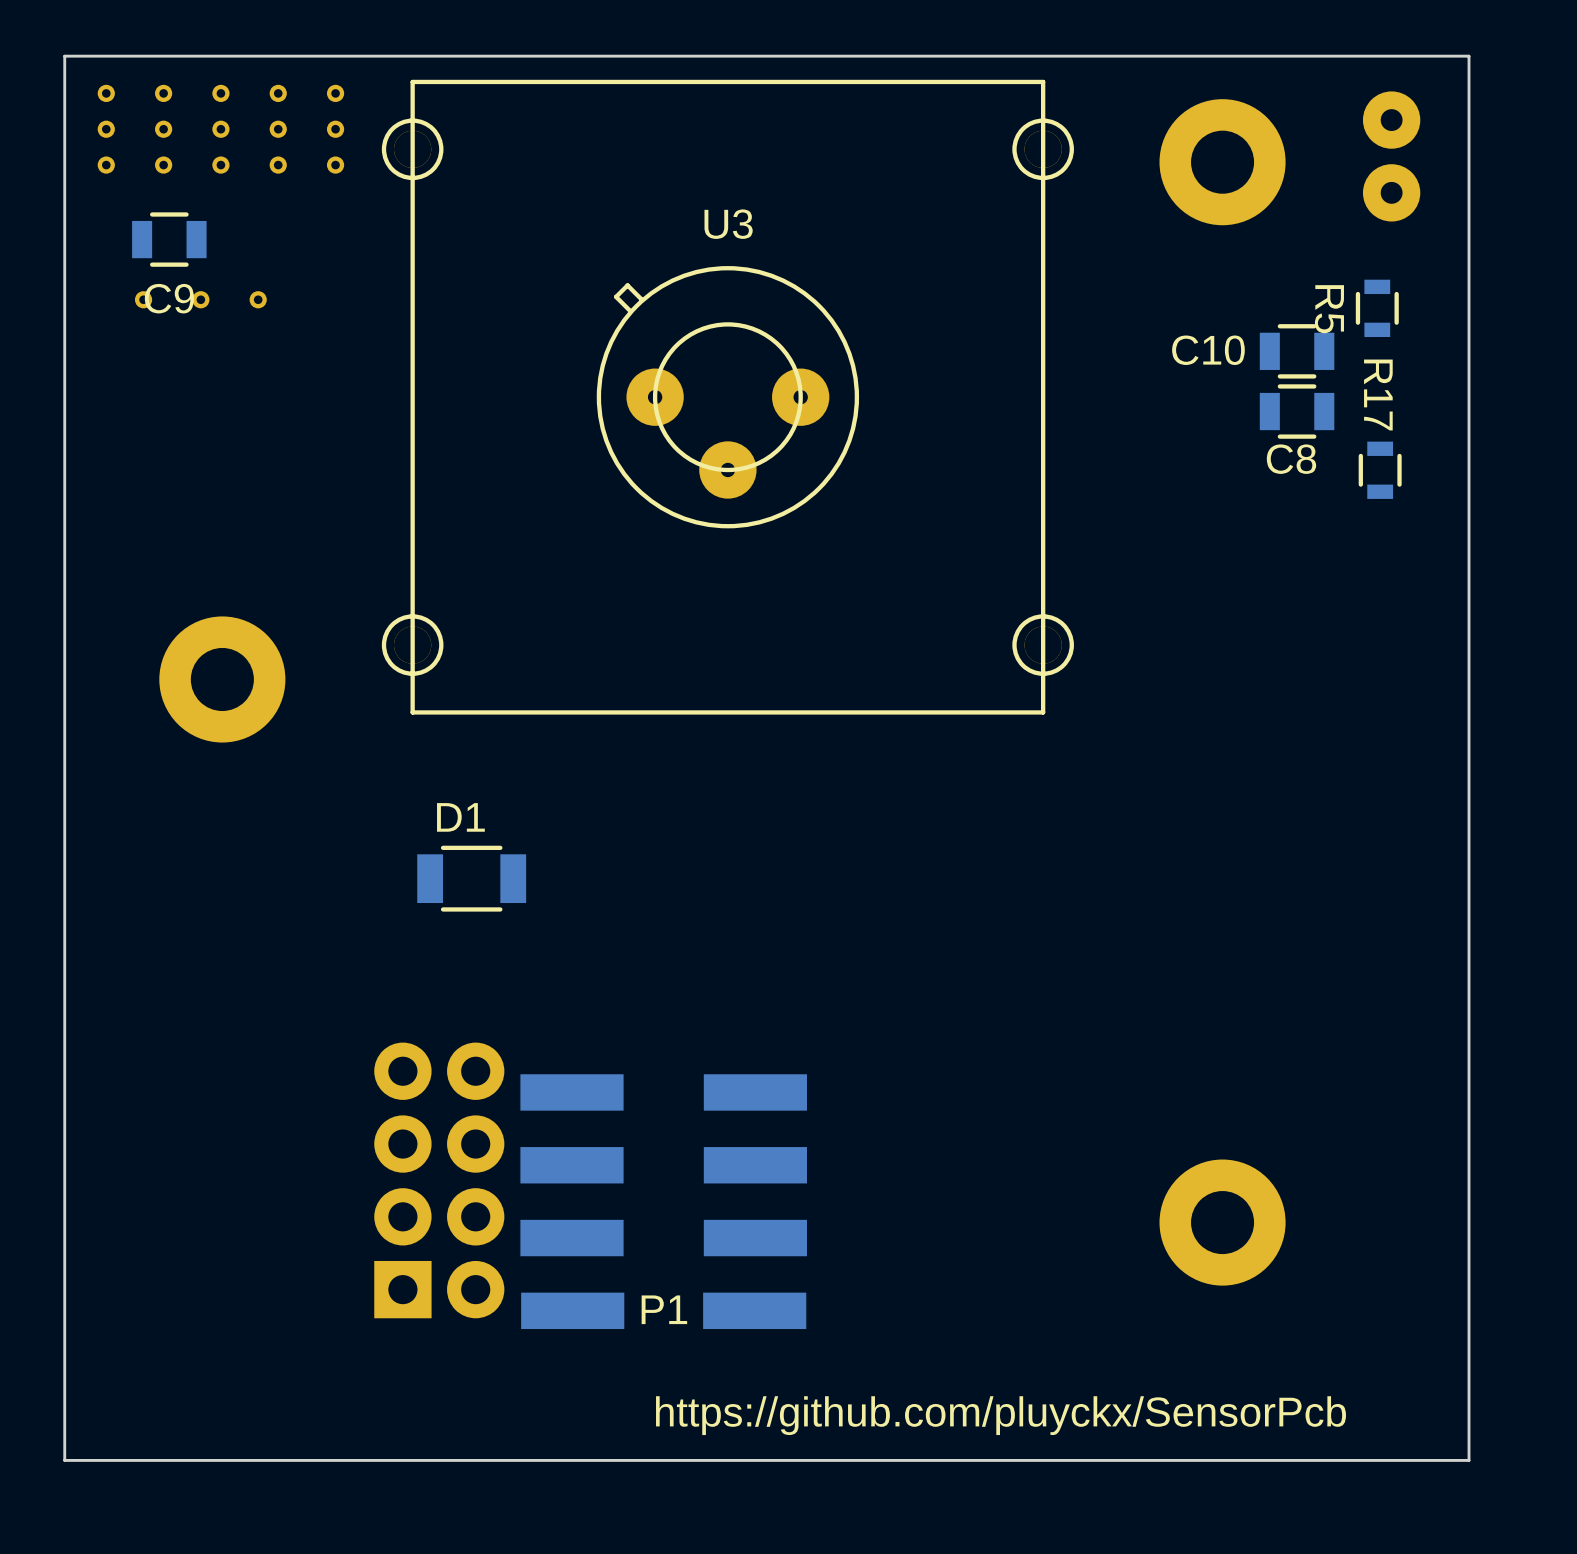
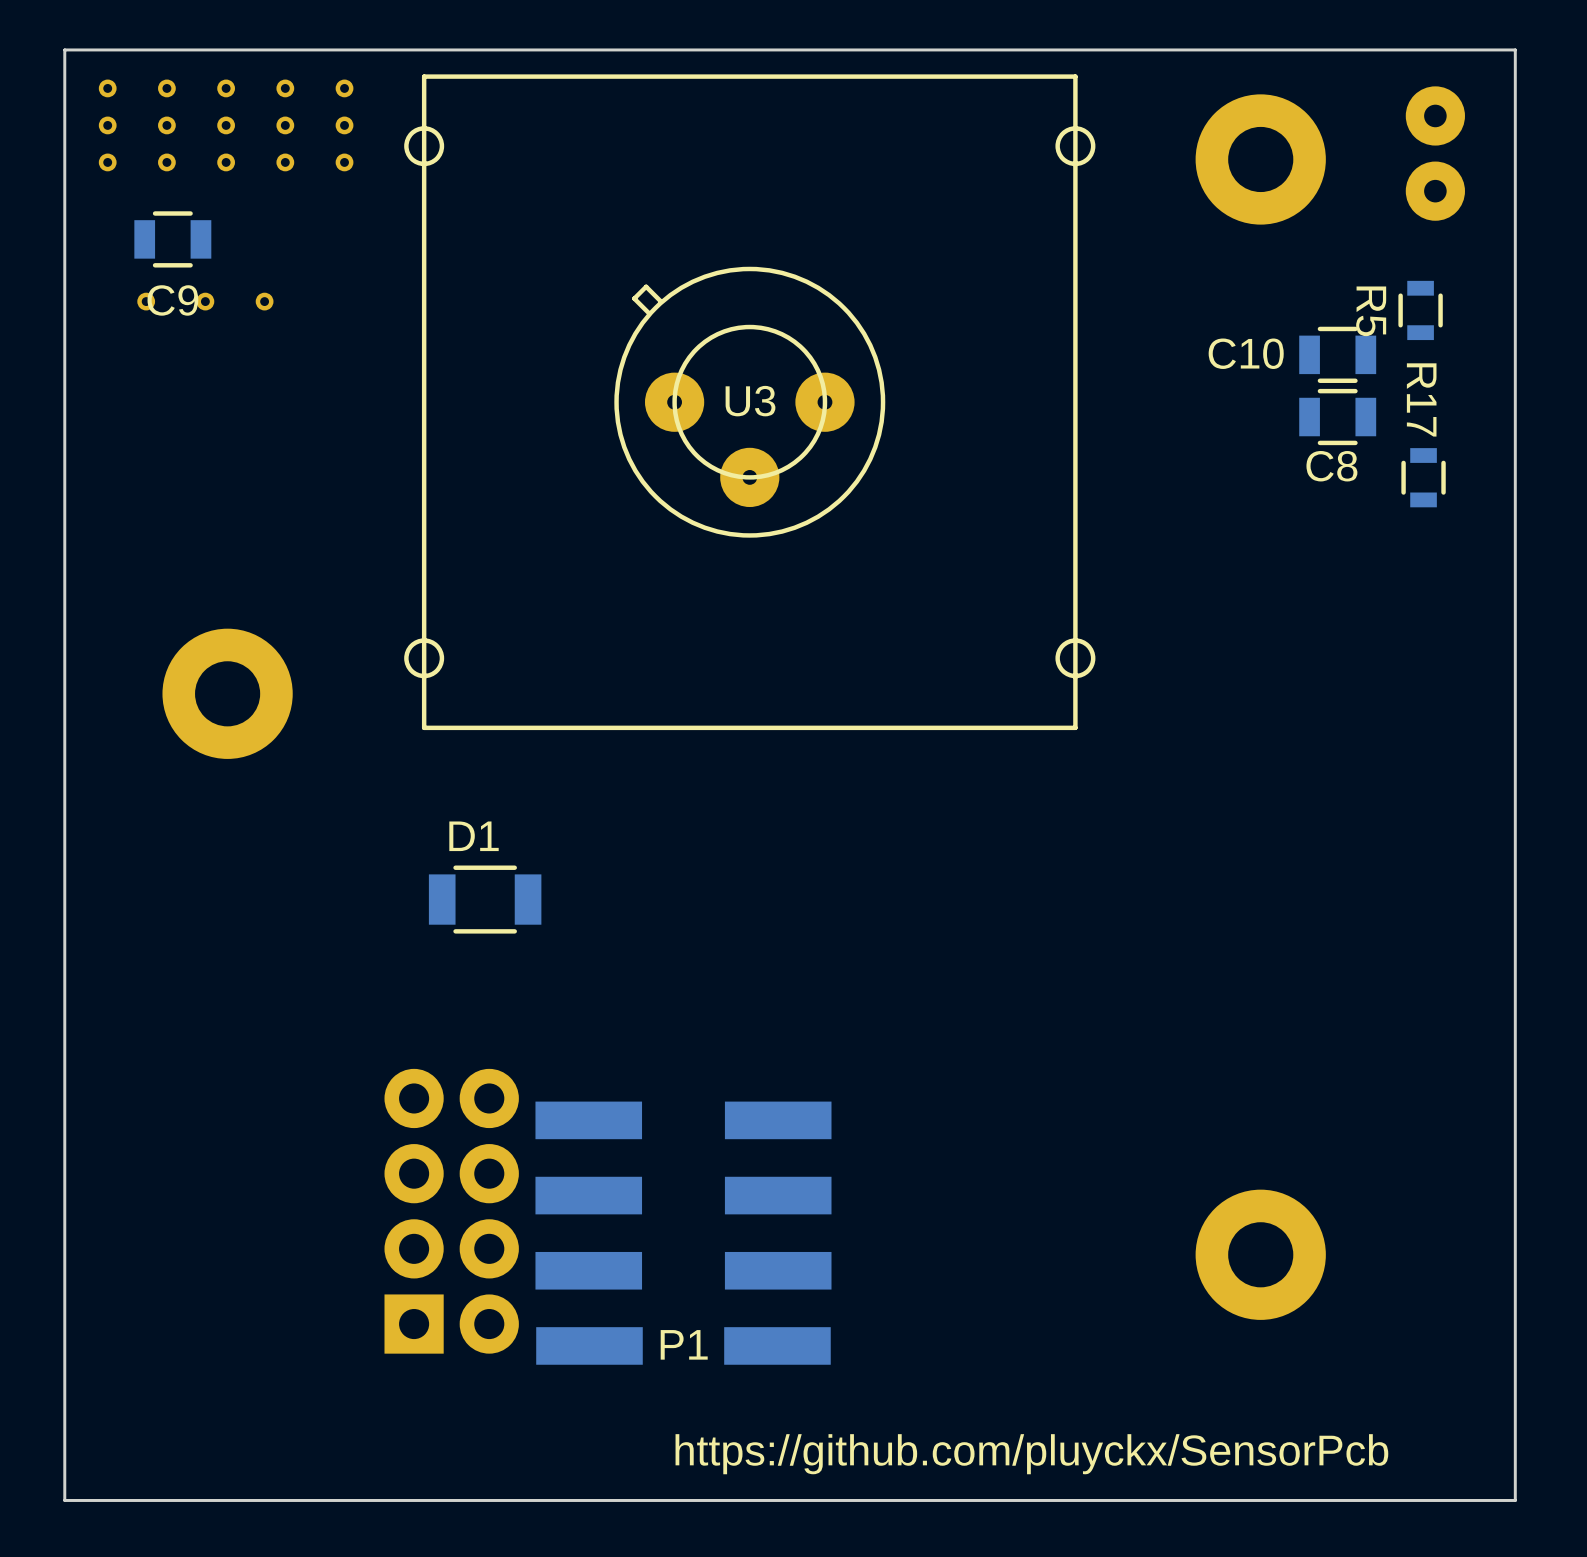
U3 footprint: [381, 79, 1074, 715] -> [404, 74, 1096, 731]
U3 name position: U3 (728, 224) -> U3 (750, 401)

